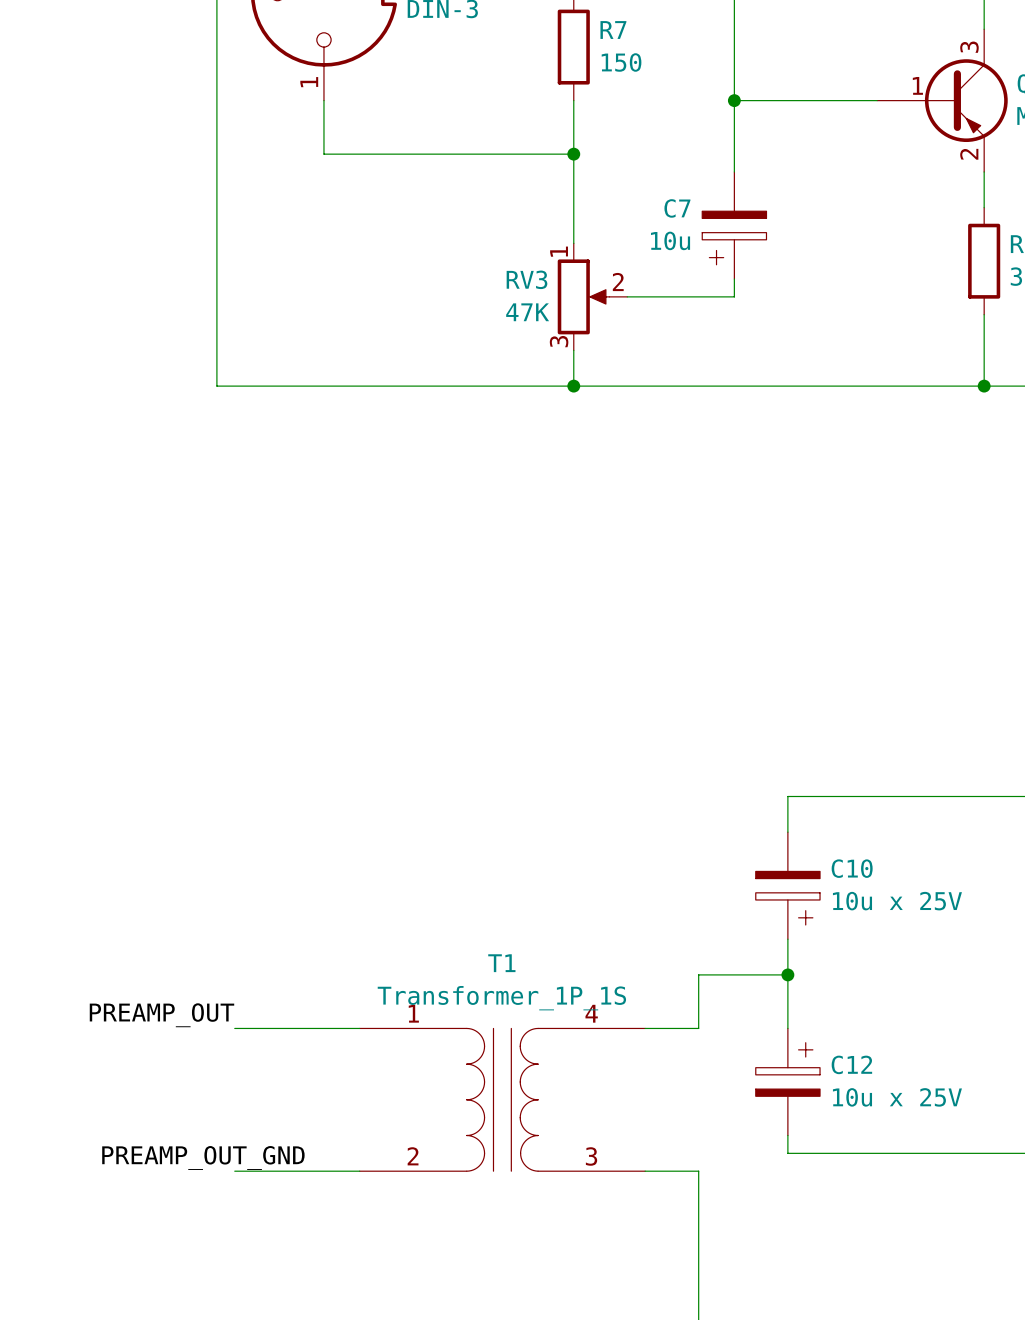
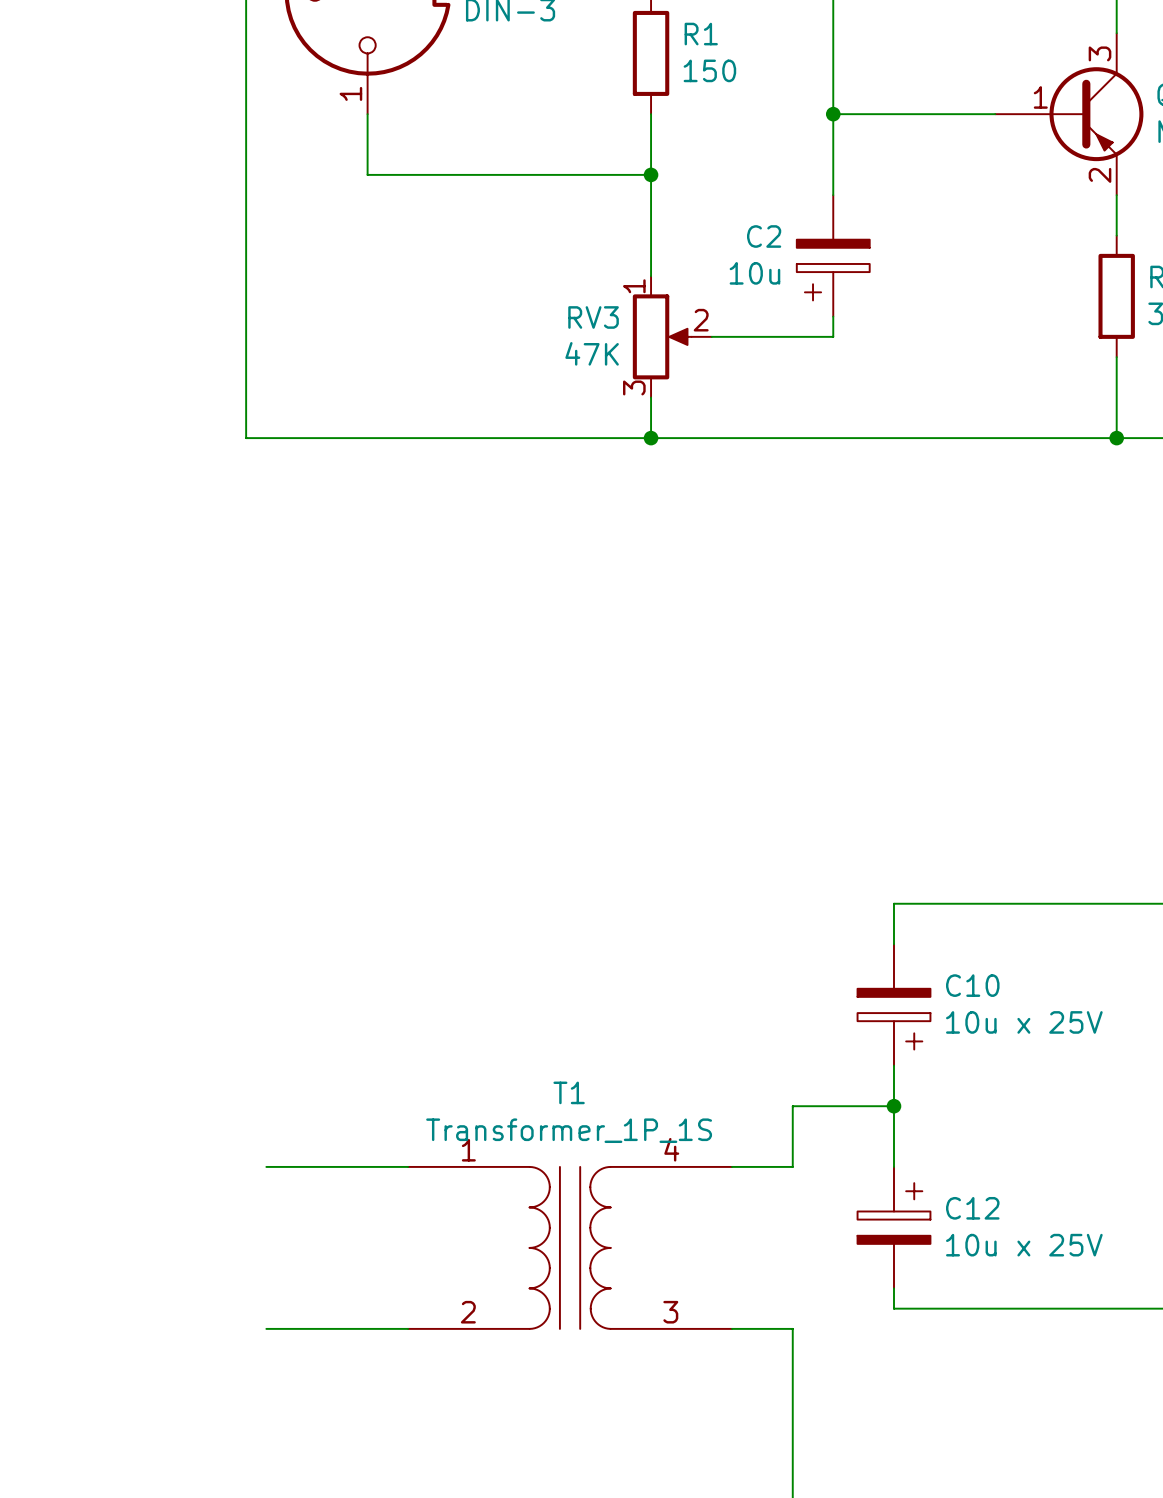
R7 name: R7 (613, 30) -> R1 (701, 34)
C7 name: C7 (677, 208) -> C2 (764, 236)
label: PREAMP_OUT (161, 1015) -> none
label: PREAMP_OUT_GND (203, 1158) -> none

